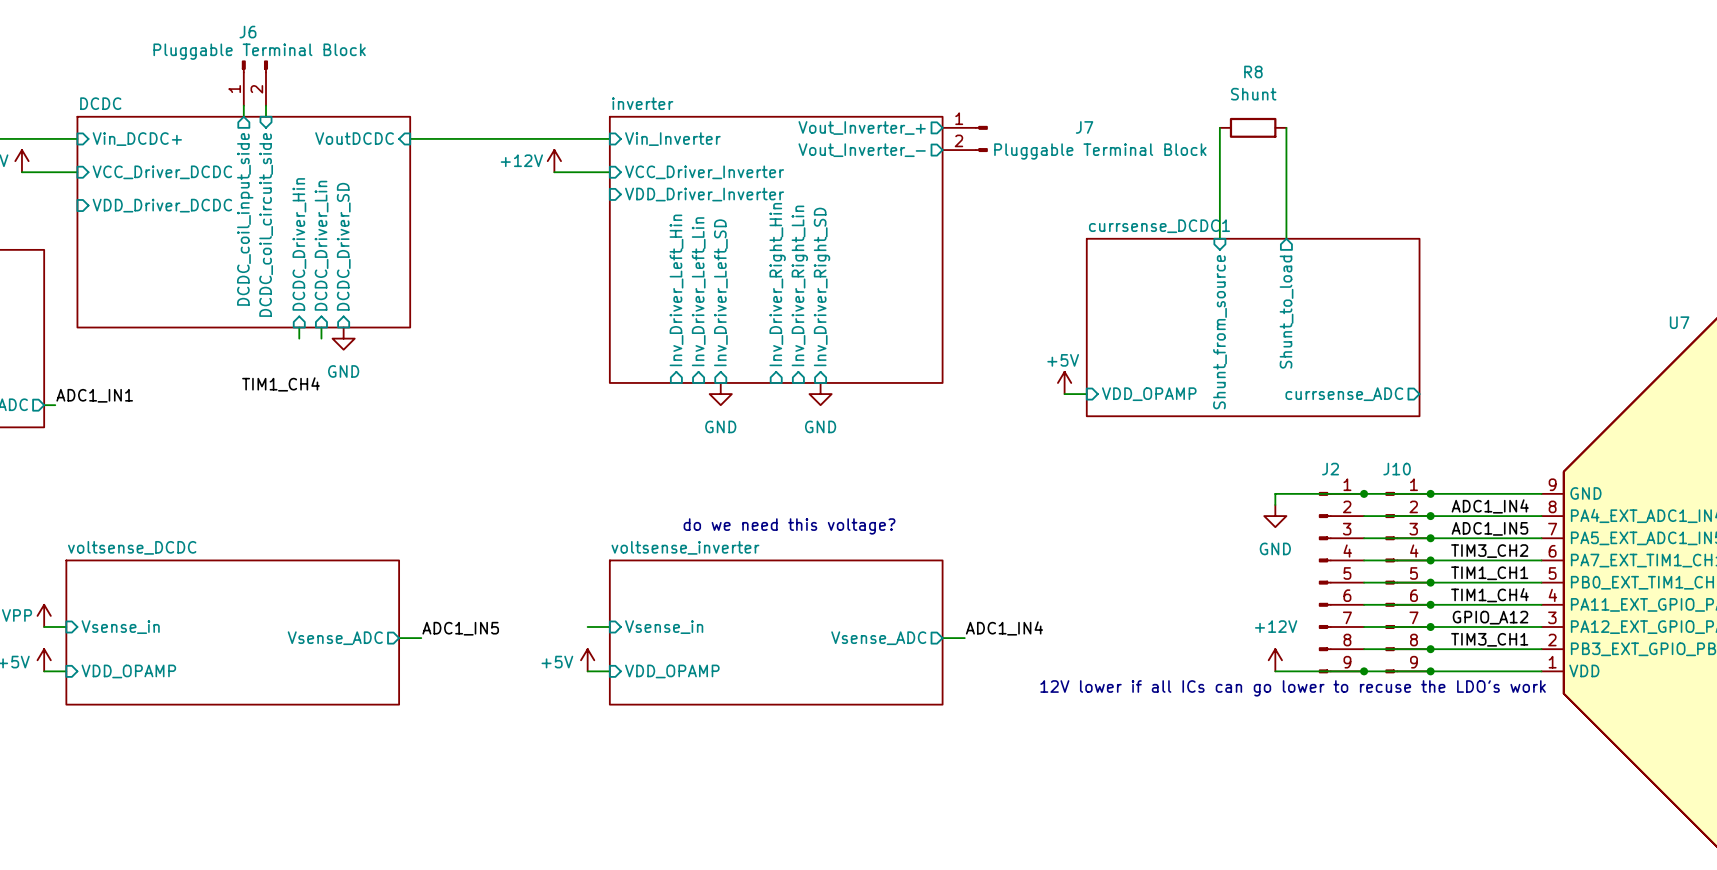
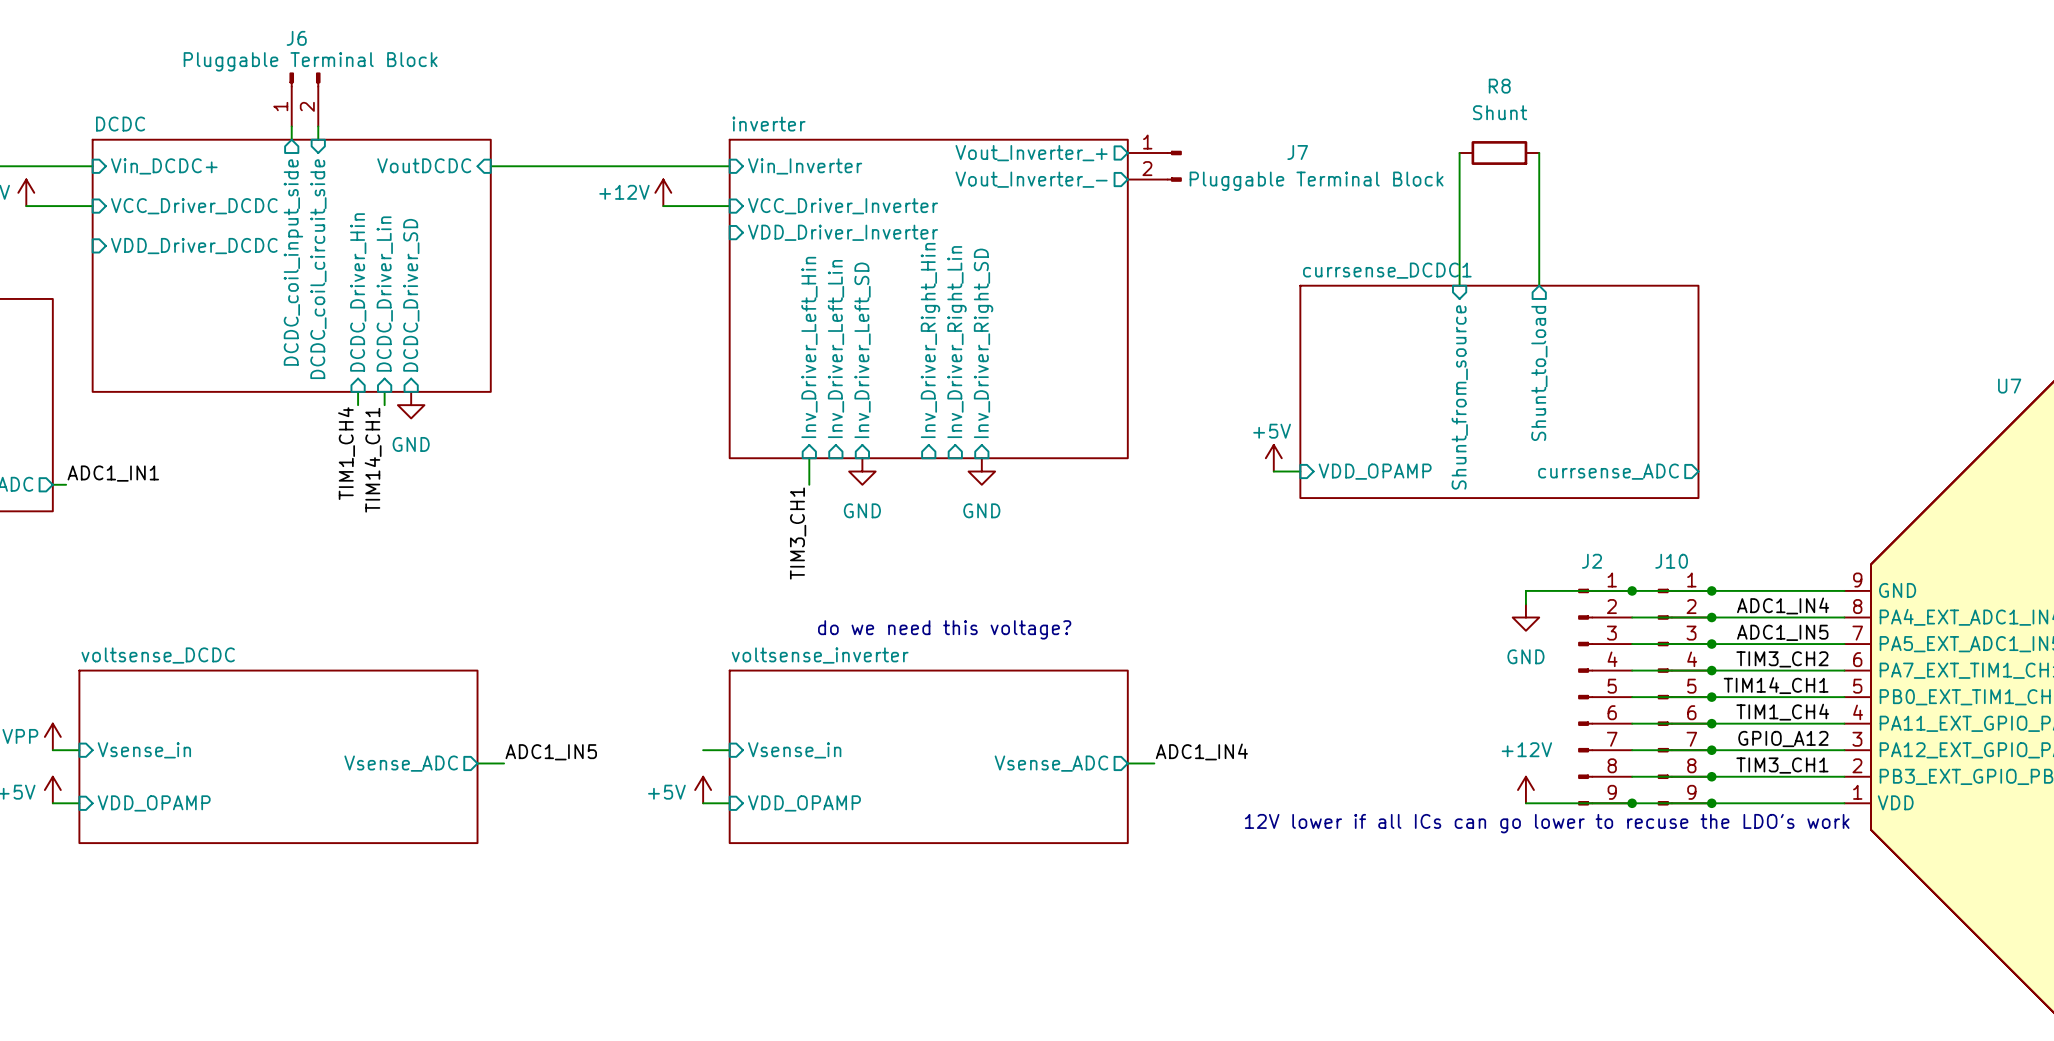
wire: none -> (809, 458) (809, 484)
label rotation: 0° (280, 384) -> 90° counterclockwise (346, 453)
label: none -> TIM14_CH1 (373, 460)
label: none -> TIM3_CH1 (798, 533)
label: TIM1_CH1 (1489, 573) -> TIM14_CH1 (1776, 685)

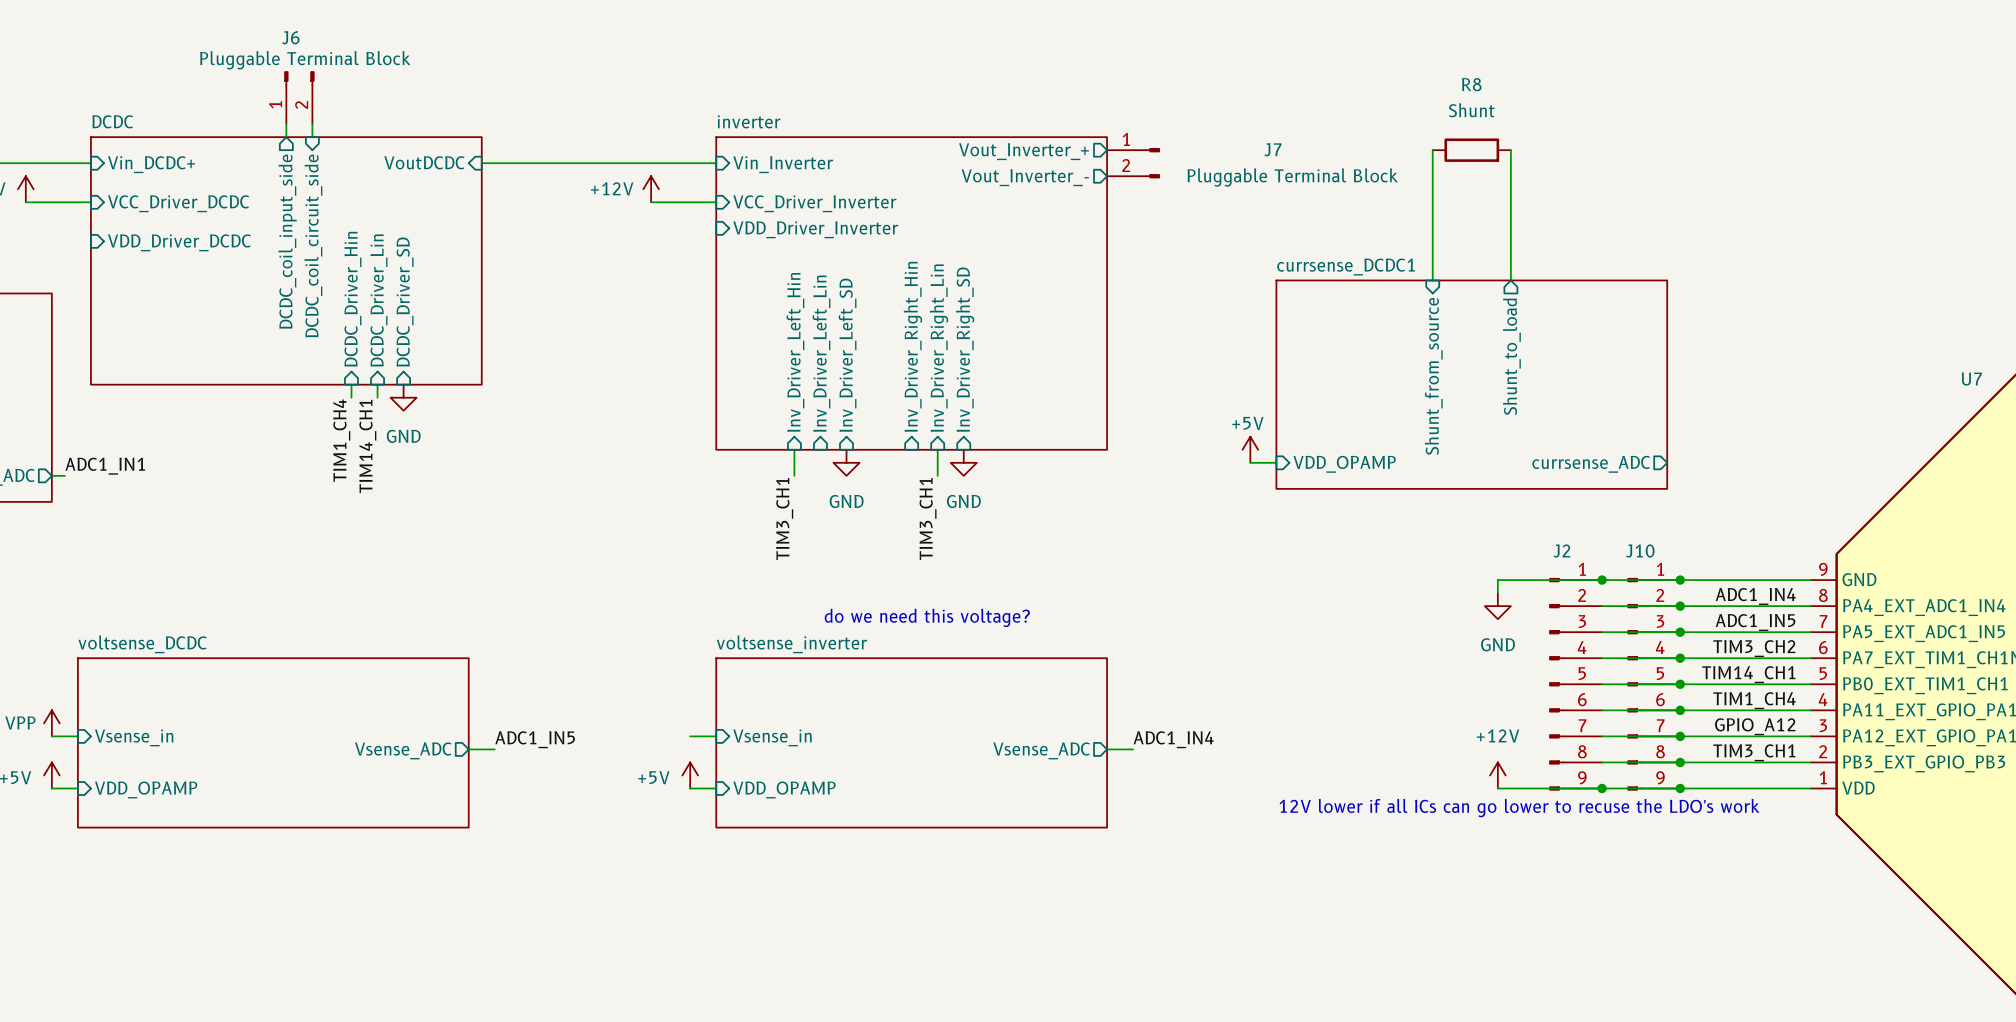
wire: none -> (937, 449) (937, 475)
label: none -> TIM3_CH1 (928, 519)

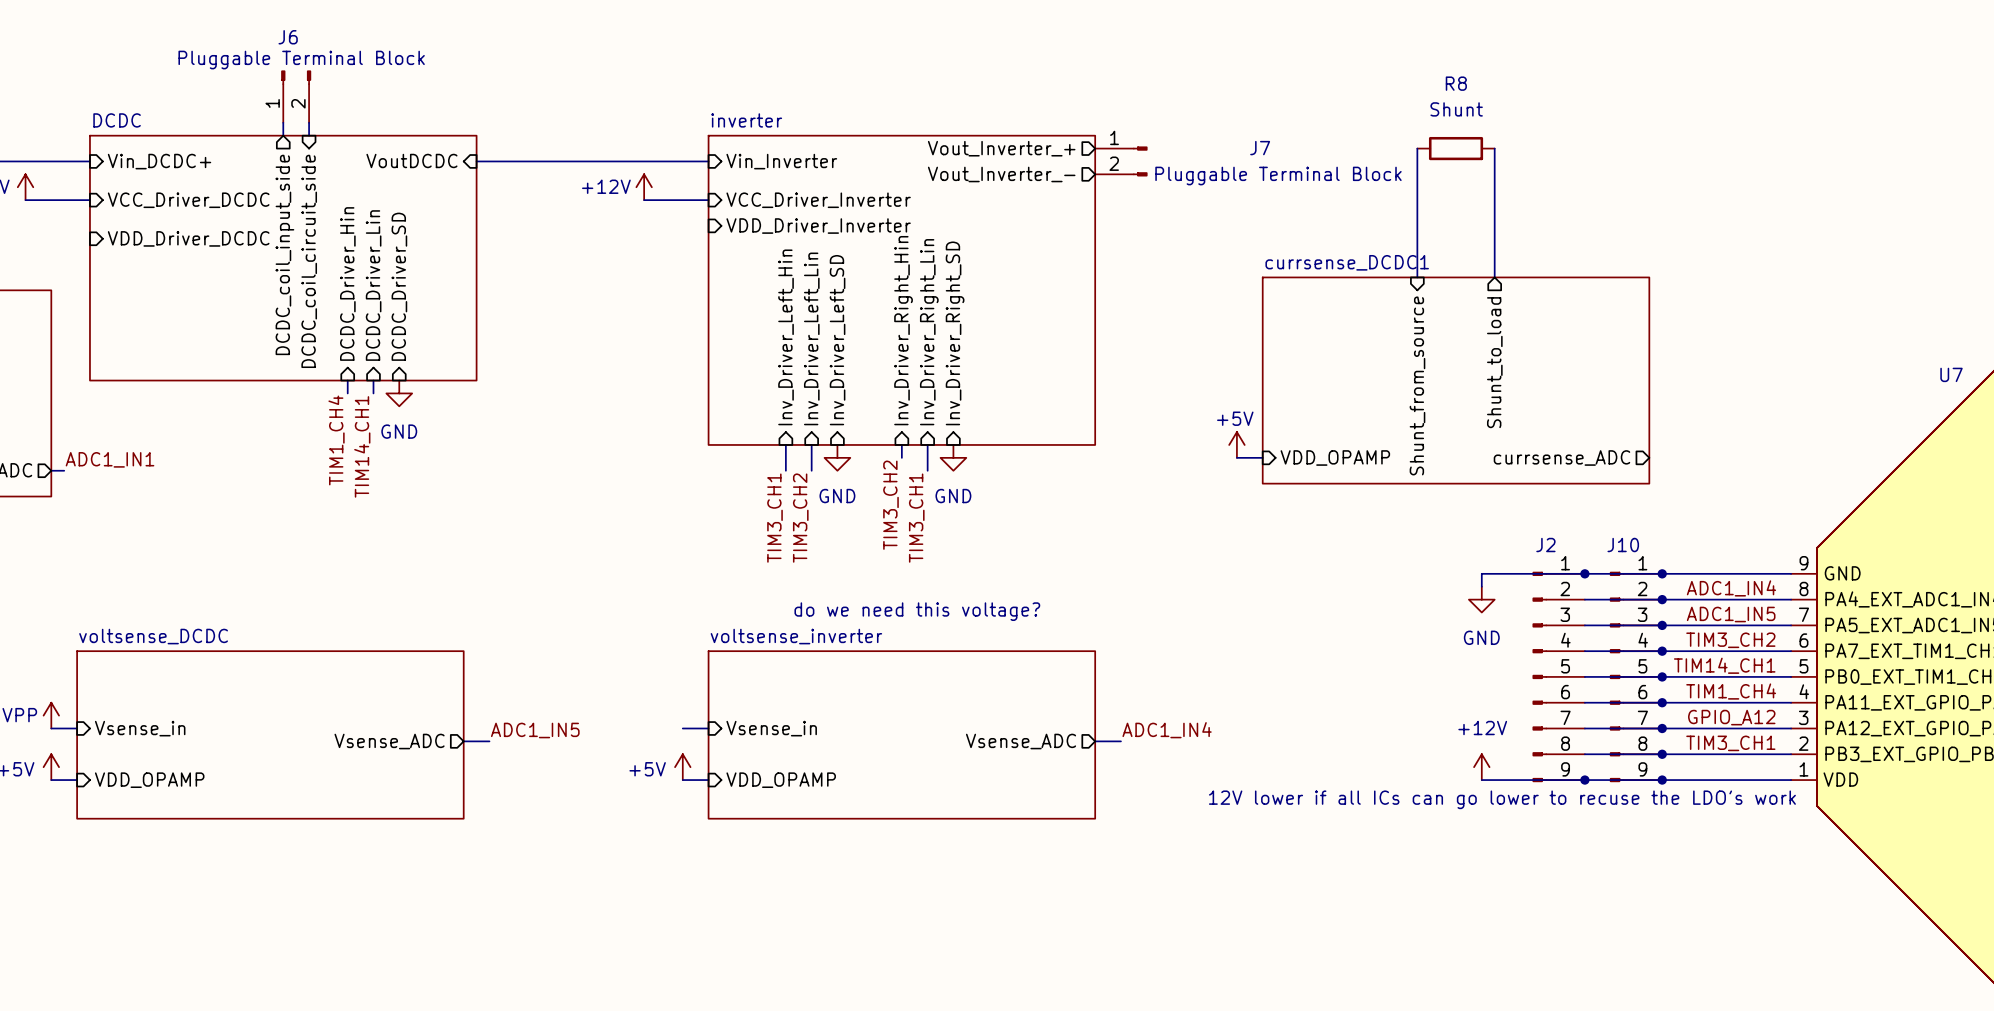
wire: none -> (811, 444) (811, 470)
wire: none -> (901, 444) (901, 457)
label: none -> TIM3_CH2 (890, 505)
label: none -> TIM3_CH2 (800, 518)

